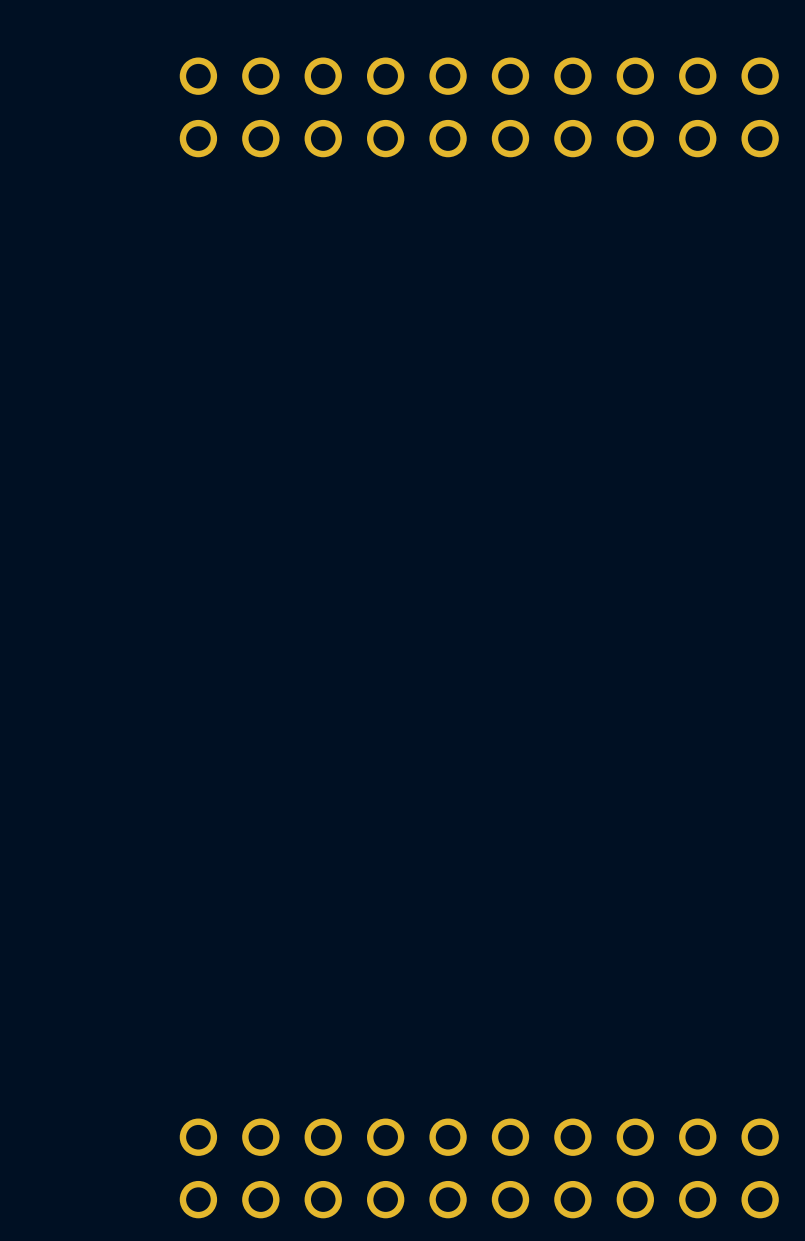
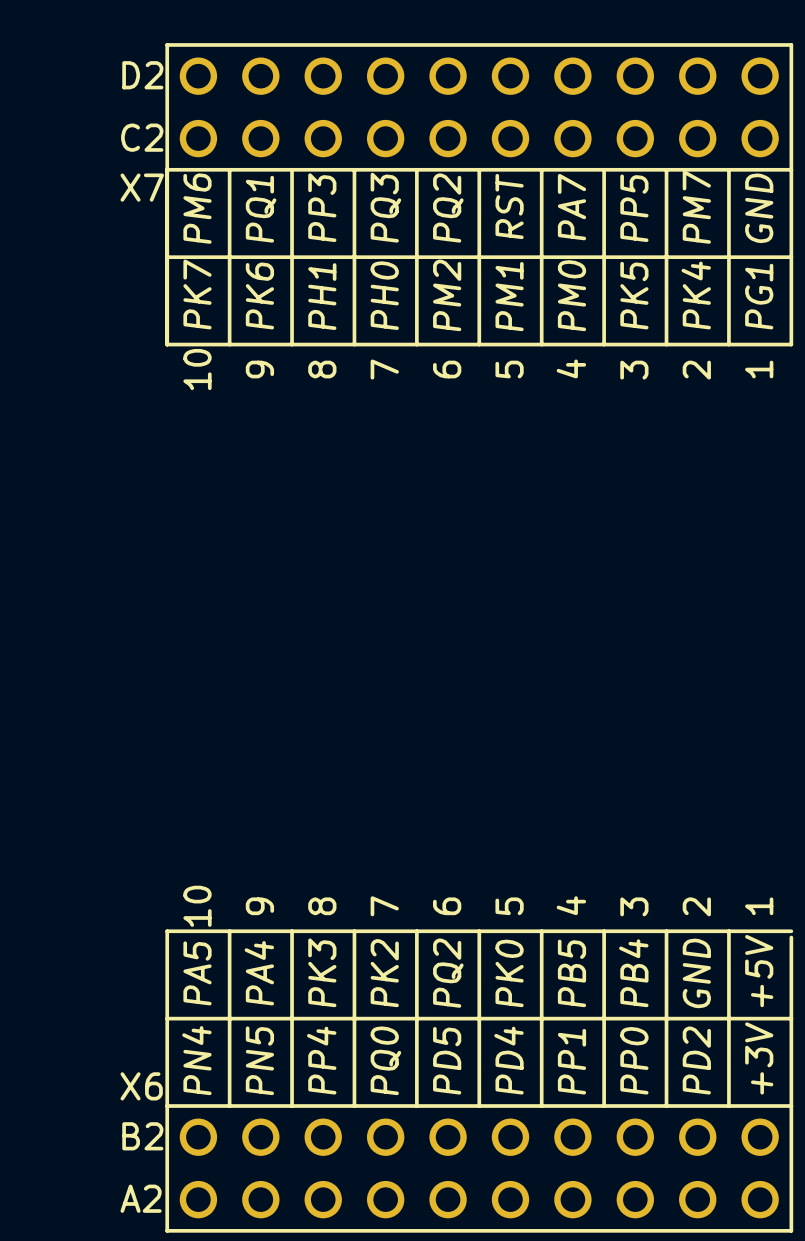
line: none -> (791, 44) (791, 344) (167, 344) (167, 44) (791, 44)
text: none -> D2 (142, 75)
text: none -> C2 (142, 137)
line: none -> (229, 169) (229, 344)
line: none -> (292, 169) (292, 344)
line: none -> (354, 169) (354, 344)
line: none -> (416, 169) (416, 344)
line: none -> (479, 169) (479, 344)
line: none -> (541, 169) (541, 344)
line: none -> (604, 169) (604, 344)
line: none -> (666, 169) (666, 344)
line: none -> (728, 169) (728, 344)
line: none -> (791, 169) (167, 169)
text: none -> X7 (142, 187)
text: none -> RST (509, 206)
text: none -> PP3 (322, 207)
text: none -> PQ3 (385, 207)
text: none -> PQ2 (448, 207)
text: none -> PA7 (571, 207)
text: none -> PM7 (696, 207)
text: none -> PM6 (197, 208)
text: none -> PP5 (634, 208)
text: none -> GND (759, 208)
text: none -> PQ1 (261, 209)
line: none -> (791, 257) (167, 257)
text: none -> PK7 (197, 294)
text: none -> PK6 (259, 295)
text: none -> PH0 (384, 295)
text: none -> PM2 (447, 295)
text: none -> PM0 (571, 295)
text: none -> PK5 (634, 295)
text: none -> PK4 (696, 295)
text: none -> PH1 (322, 296)
text: none -> PM1 (509, 296)
text: none -> PG1 (759, 296)
text: none -> 4 (571, 368)
text: none -> 10 (197, 369)
text: none -> 9 (259, 369)
text: none -> 8 (322, 369)
text: none -> 7 (384, 369)
text: none -> 6 (447, 369)
text: none -> 5 (509, 369)
text: none -> 1 (759, 369)
text: none -> 3 (634, 370)
text: none -> 2 (696, 370)
text: none -> 4 (571, 905)
text: none -> 10 (197, 906)
text: none -> 9 (259, 906)
text: none -> 8 (322, 906)
text: none -> 7 (384, 906)
text: none -> 6 (447, 906)
text: none -> 5 (509, 906)
text: none -> 3 (634, 906)
text: none -> 2 (696, 906)
text: none -> 1 (759, 906)
line: none -> (229, 931) (229, 1106)
line: none -> (292, 931) (292, 1106)
line: none -> (354, 931) (354, 1106)
line: none -> (416, 931) (416, 1106)
line: none -> (479, 931) (479, 1106)
line: none -> (541, 931) (541, 1106)
line: none -> (604, 931) (604, 1106)
line: none -> (666, 931) (666, 1106)
line: none -> (728, 931) (728, 1106)
line: none -> (791, 931) (167, 931) (167, 1230) (791, 1230) (791, 937)
text: none -> +5V (759, 971)
text: none -> PK3 (322, 972)
text: none -> PA5 (197, 973)
text: none -> PA4 (259, 973)
text: none -> PK2 (384, 973)
text: none -> PQ2 (448, 973)
text: none -> PK0 (509, 973)
text: none -> PB5 (571, 973)
text: none -> PB4 (633, 973)
text: none -> GND (696, 973)
line: none -> (791, 1018) (167, 1018)
text: none -> +3V (759, 1058)
text: none -> PN4 (196, 1060)
text: none -> PN5 (259, 1060)
text: none -> PP4 (321, 1060)
text: none -> PQ0 (385, 1060)
text: none -> PD5 (447, 1060)
text: none -> PD4 (508, 1060)
text: none -> PP0 (634, 1060)
text: none -> PD2 (696, 1060)
text: none -> PP1 (571, 1061)
text: none -> X6 (141, 1086)
line: none -> (791, 1106) (167, 1106)
text: none -> B2 (142, 1136)
text: none -> A2 (141, 1198)

